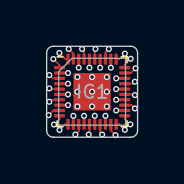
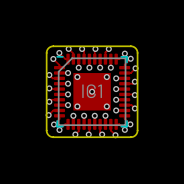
via: (92, 77) -> none
via: (77, 91) -> none
via: (106, 91) -> none
via: (92, 106) -> none

